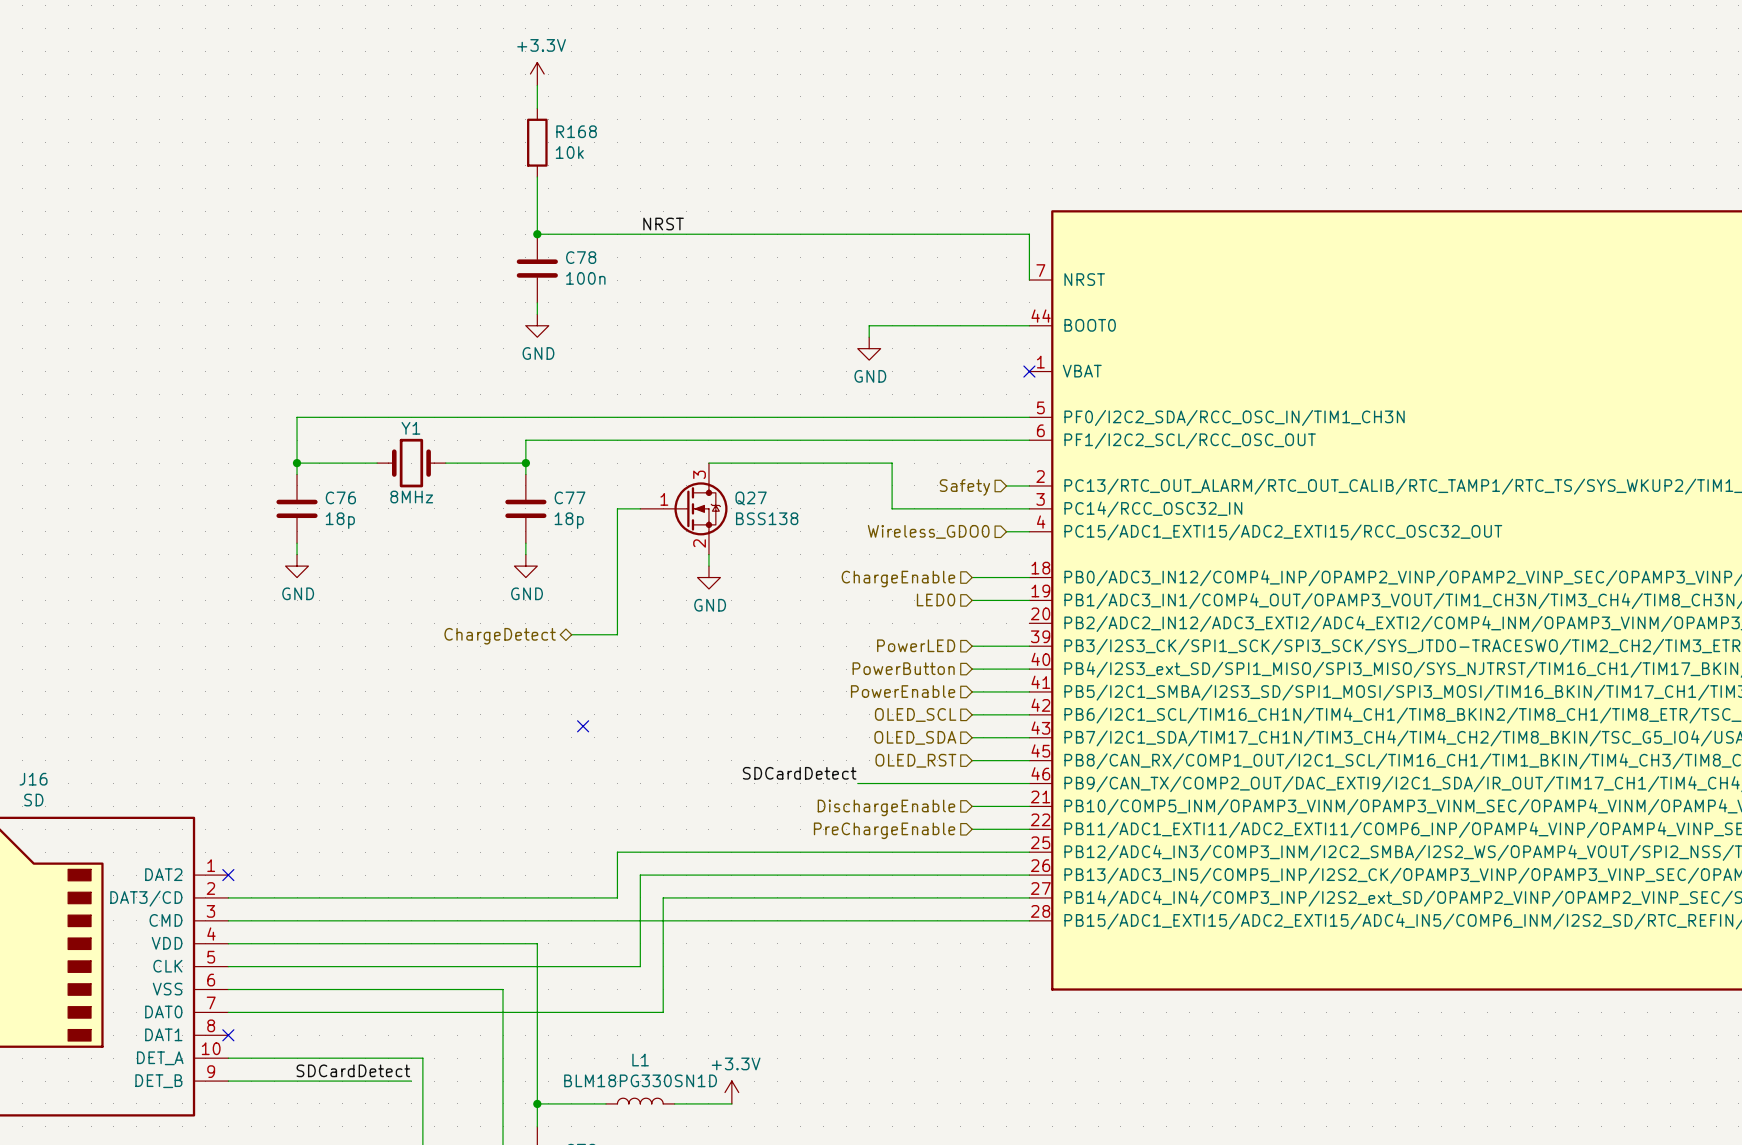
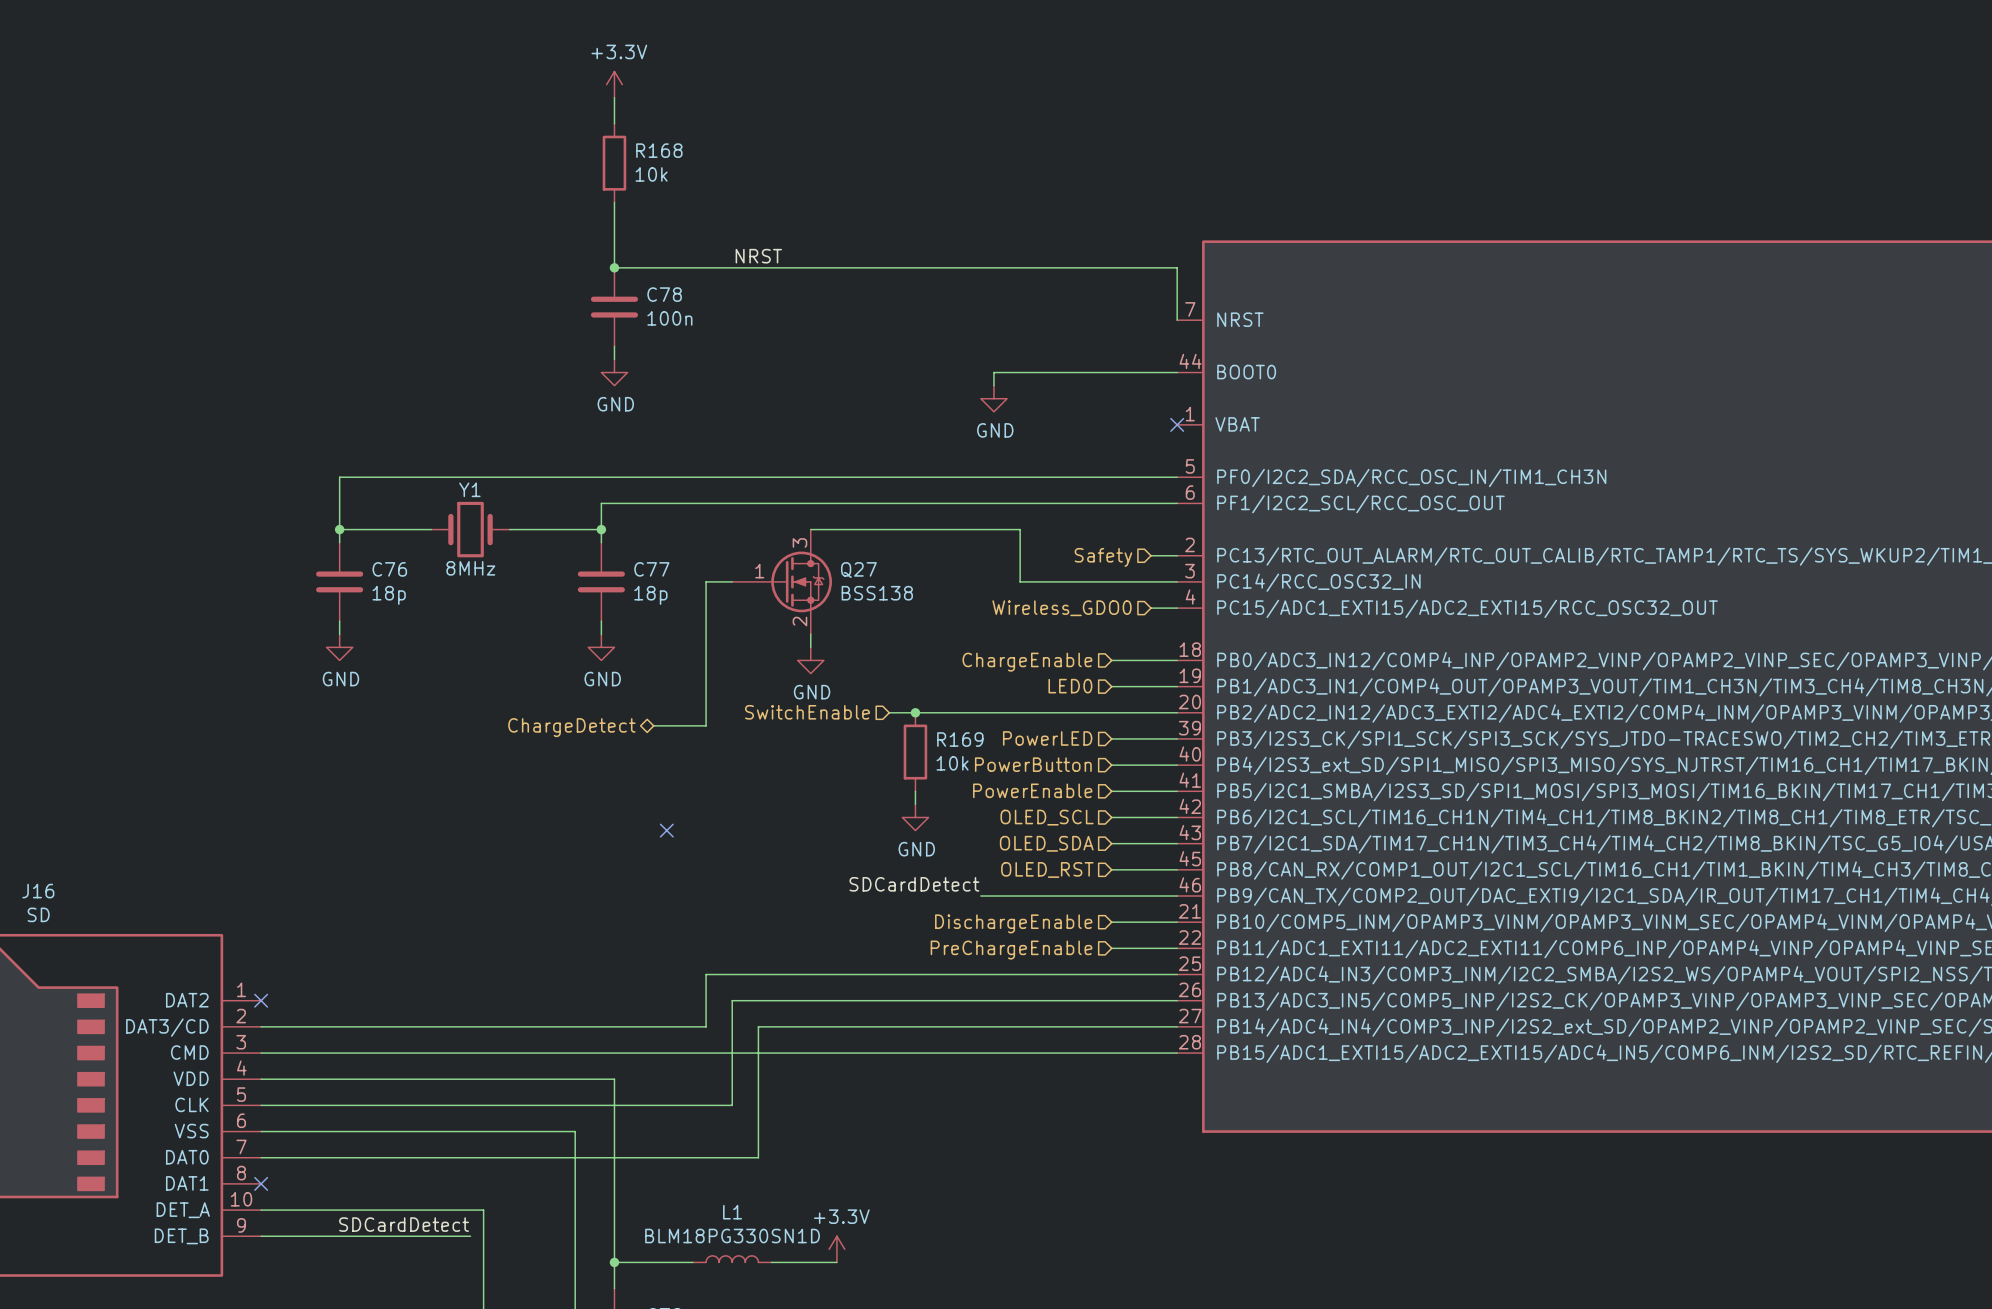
hierarchical label: none -> SwitchEnable (807, 712)
wire: none -> (889, 712) (1177, 712)
junction: none -> (915, 712)
R169: none -> 10k (915, 752)
wire: none -> (915, 791) (915, 804)
power symbol: none -> GND (915, 817)

